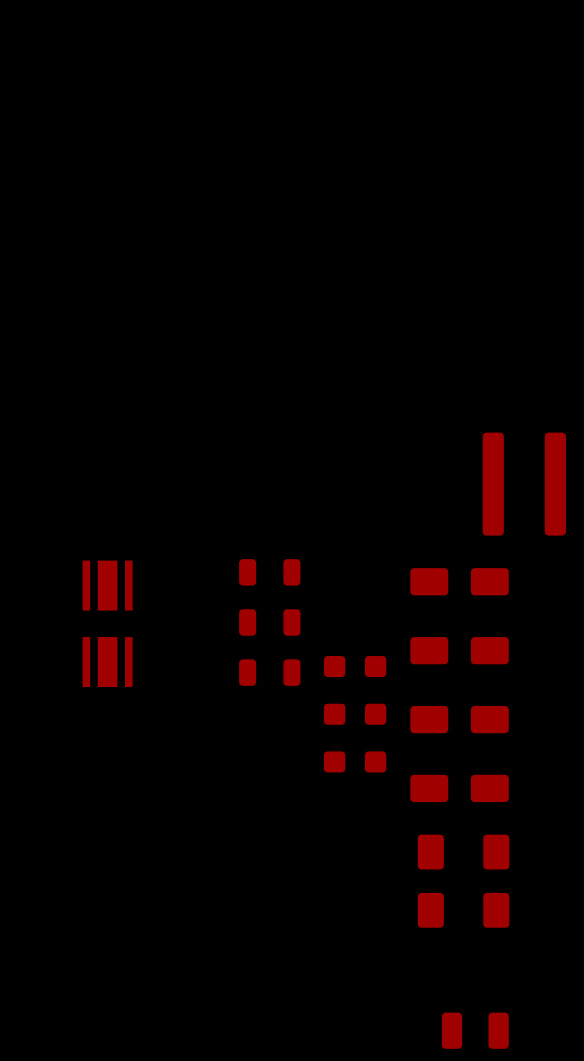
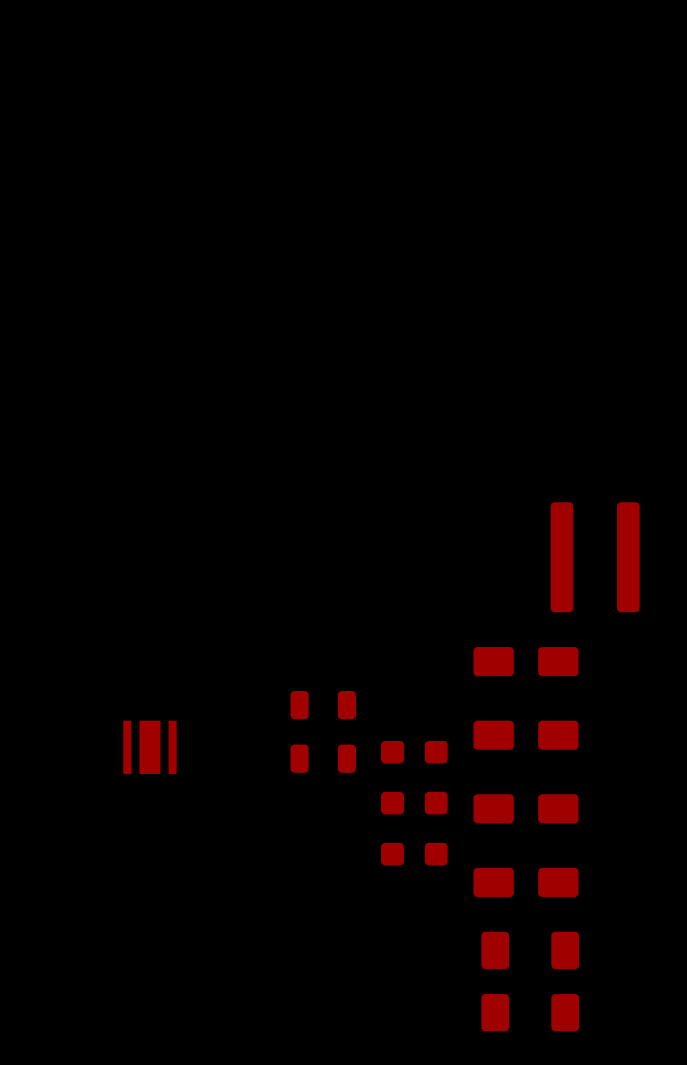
part: (269, 572) -> none
part: (107, 585) -> none

